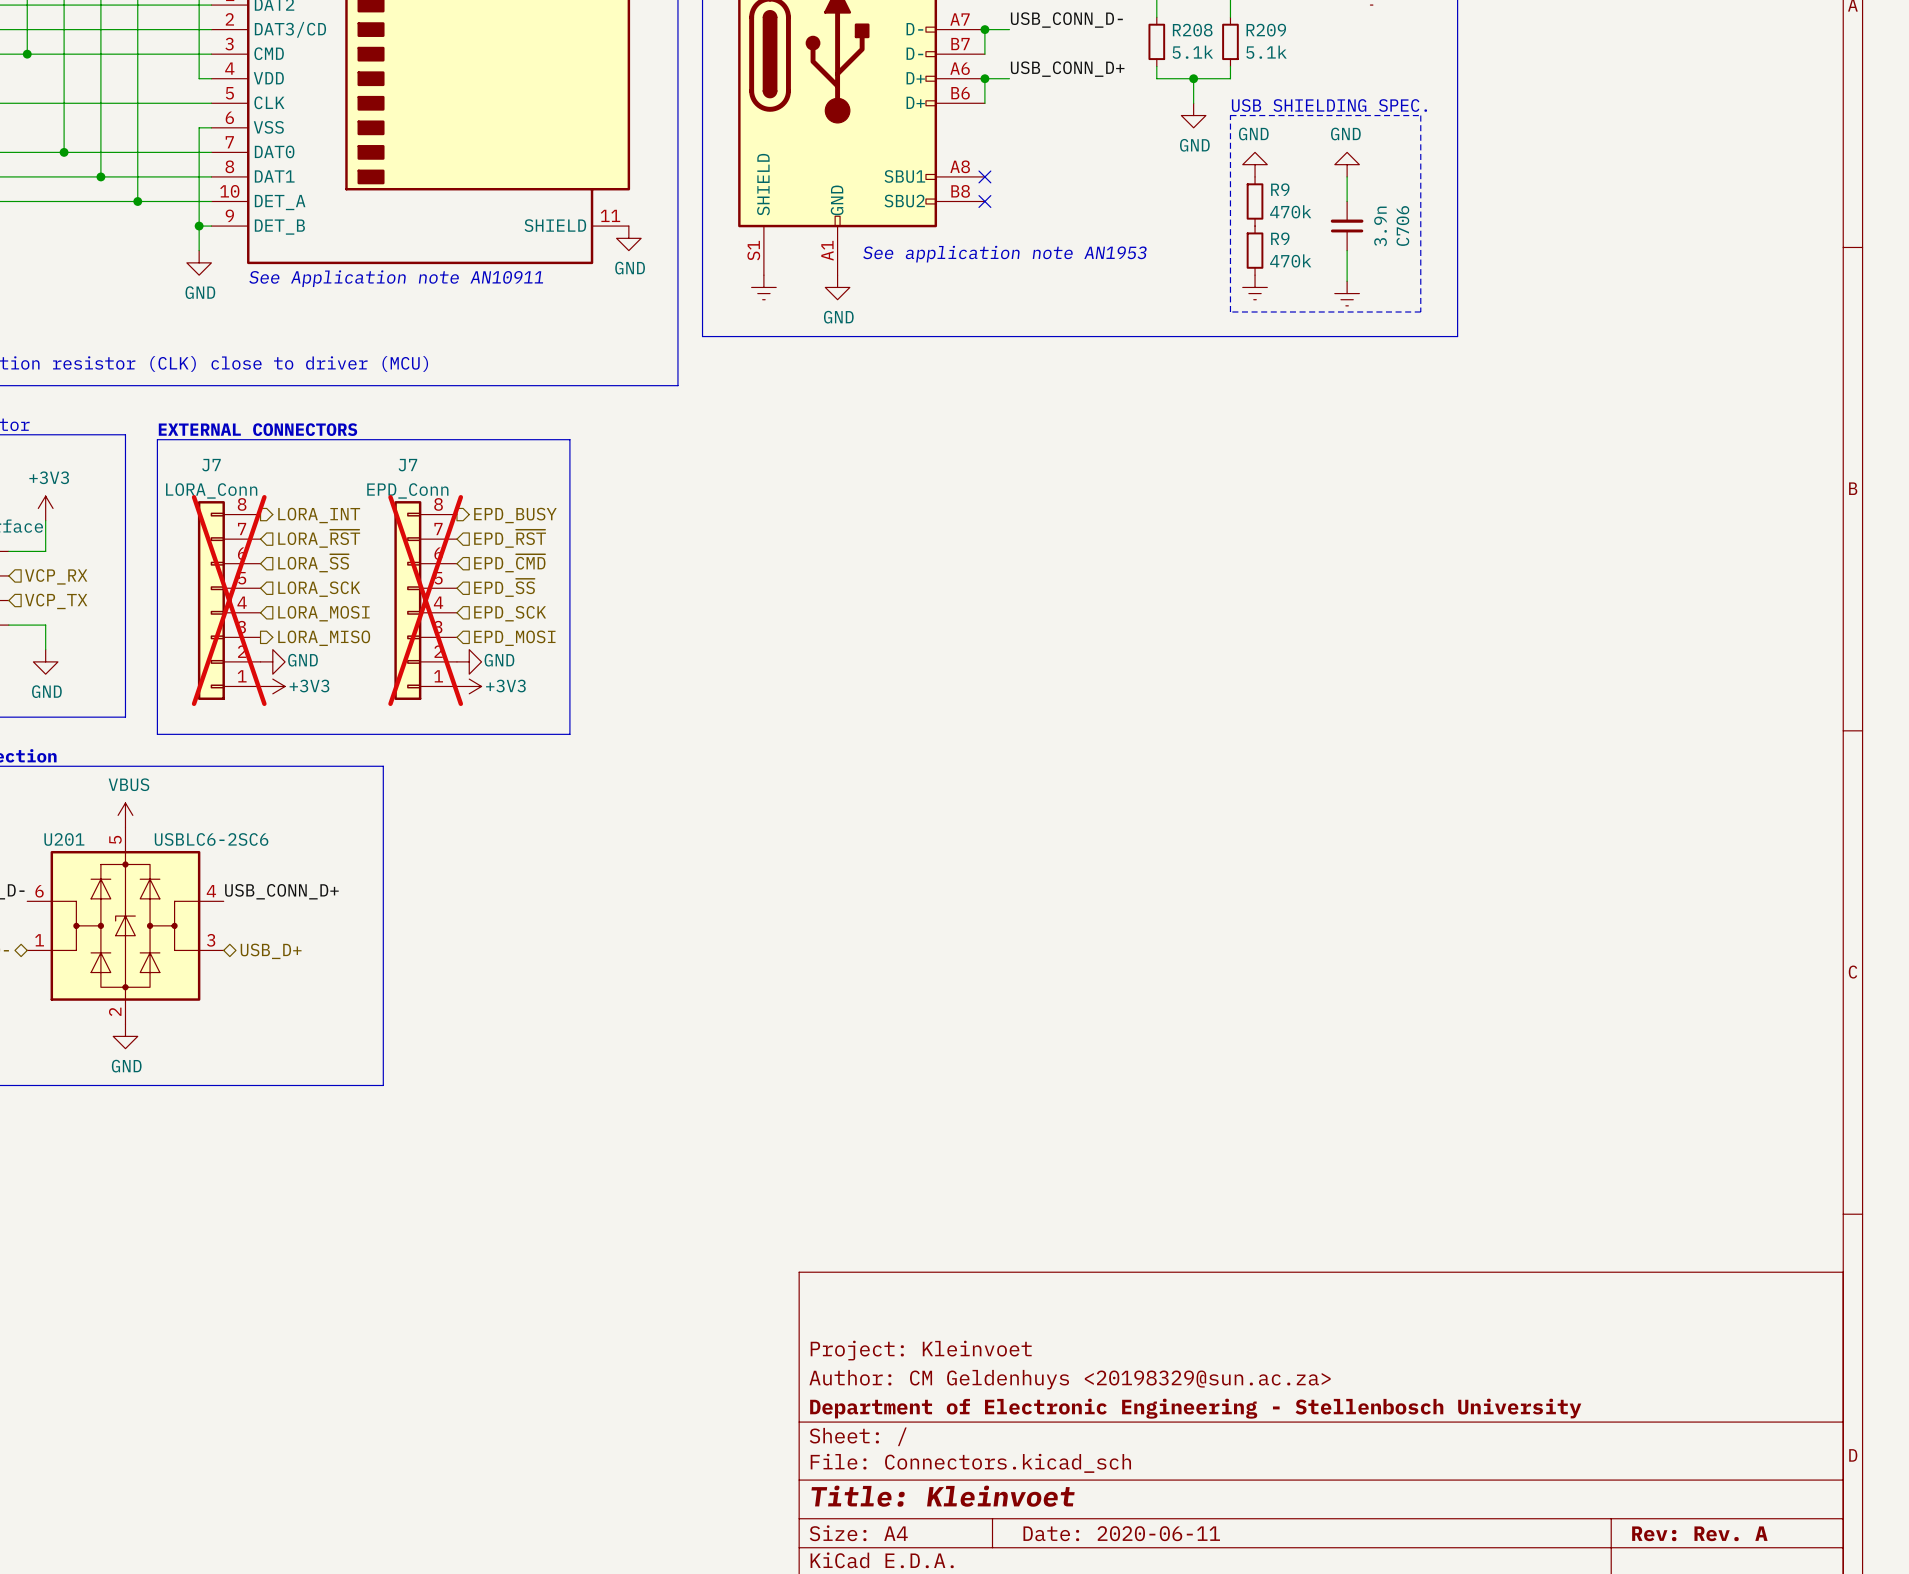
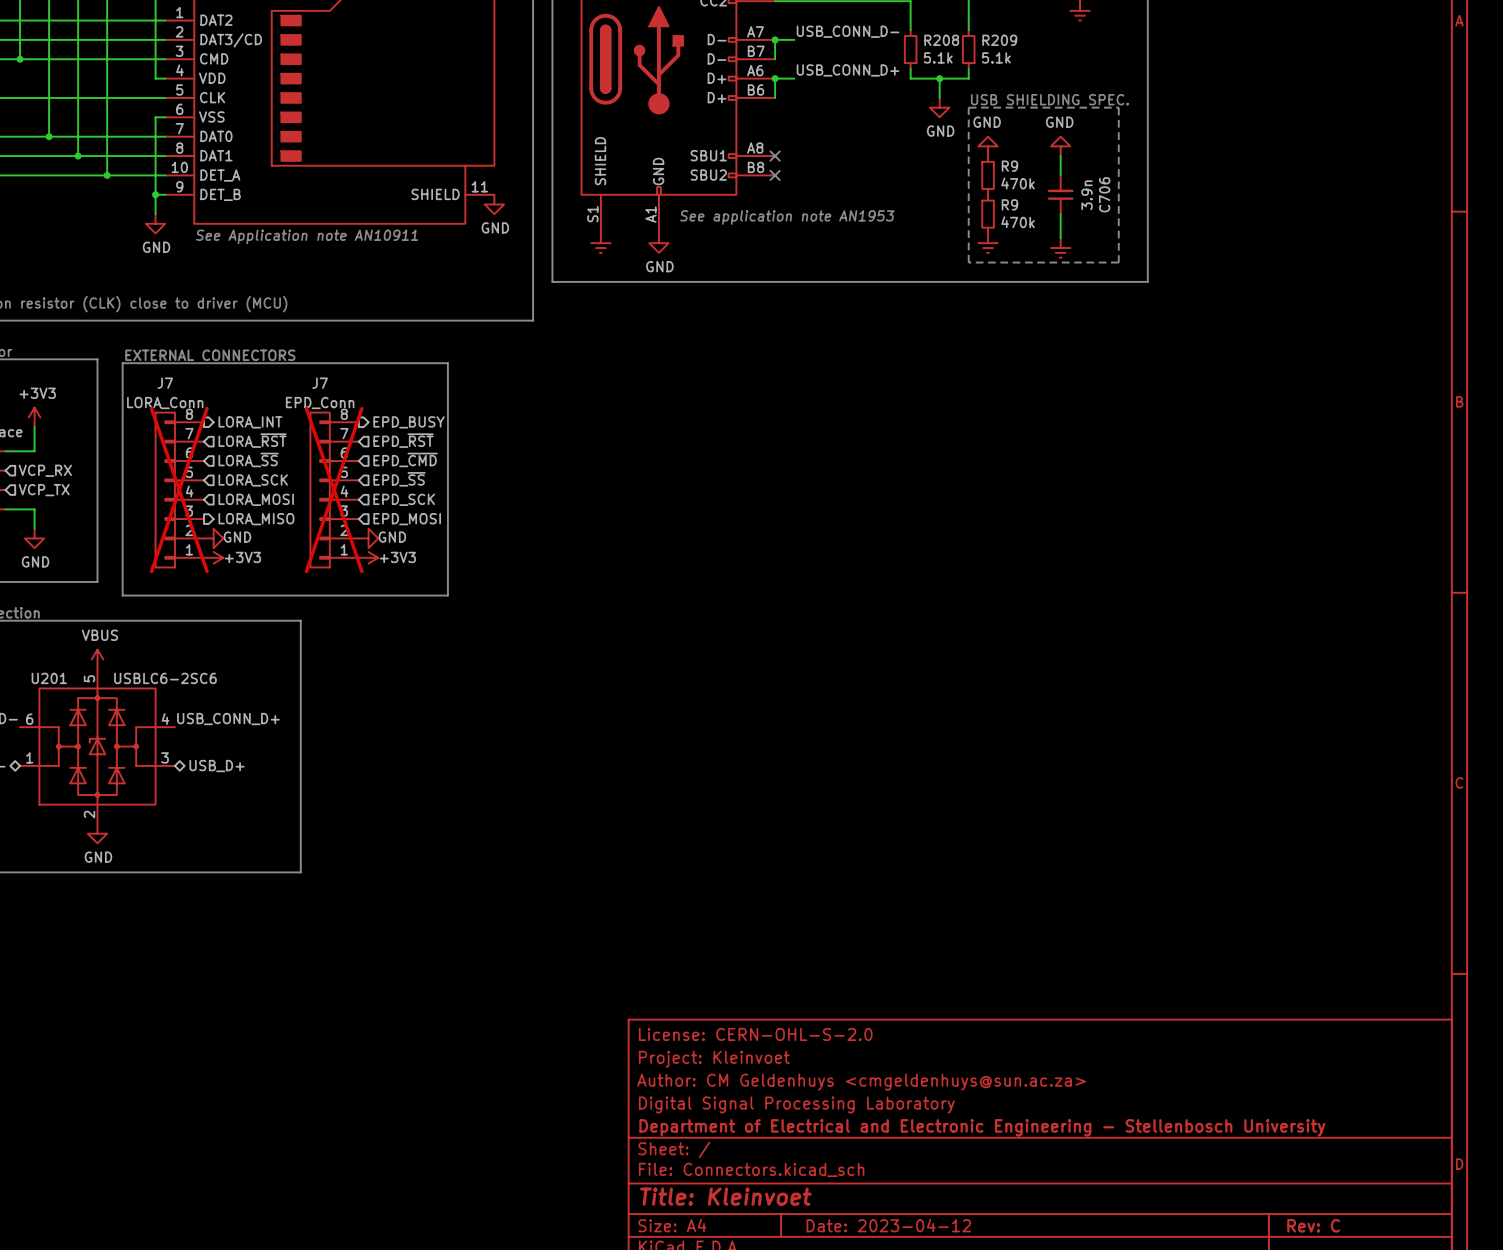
title block: none -> License: CERN-OHL-S-2.0 (755, 1034)
title block: none -> Project: Kleinvoet (714, 1059)
title block: Project: Kleinvoet (921, 1350) -> Author: CM Geldenhuys <cmgeldenhuys@sun.ac.za> (861, 1082)
title block: Author: CM Geldenhuys <20198329@sun.ac.za> (1070, 1379) -> Digital Signal Processing Laboratory (796, 1104)
title block: Department of Electronic Engineering - Stellenbosch University (1195, 1408) -> Department of Electrical and Electronic Engineering - Stellenbosch University (982, 1127)
title block: Date: 2020-06-11 (1121, 1533) -> Date: 2023-04-12 (888, 1225)
title block: Rev: Rev. A (1699, 1533) -> Rev: C (1313, 1225)

